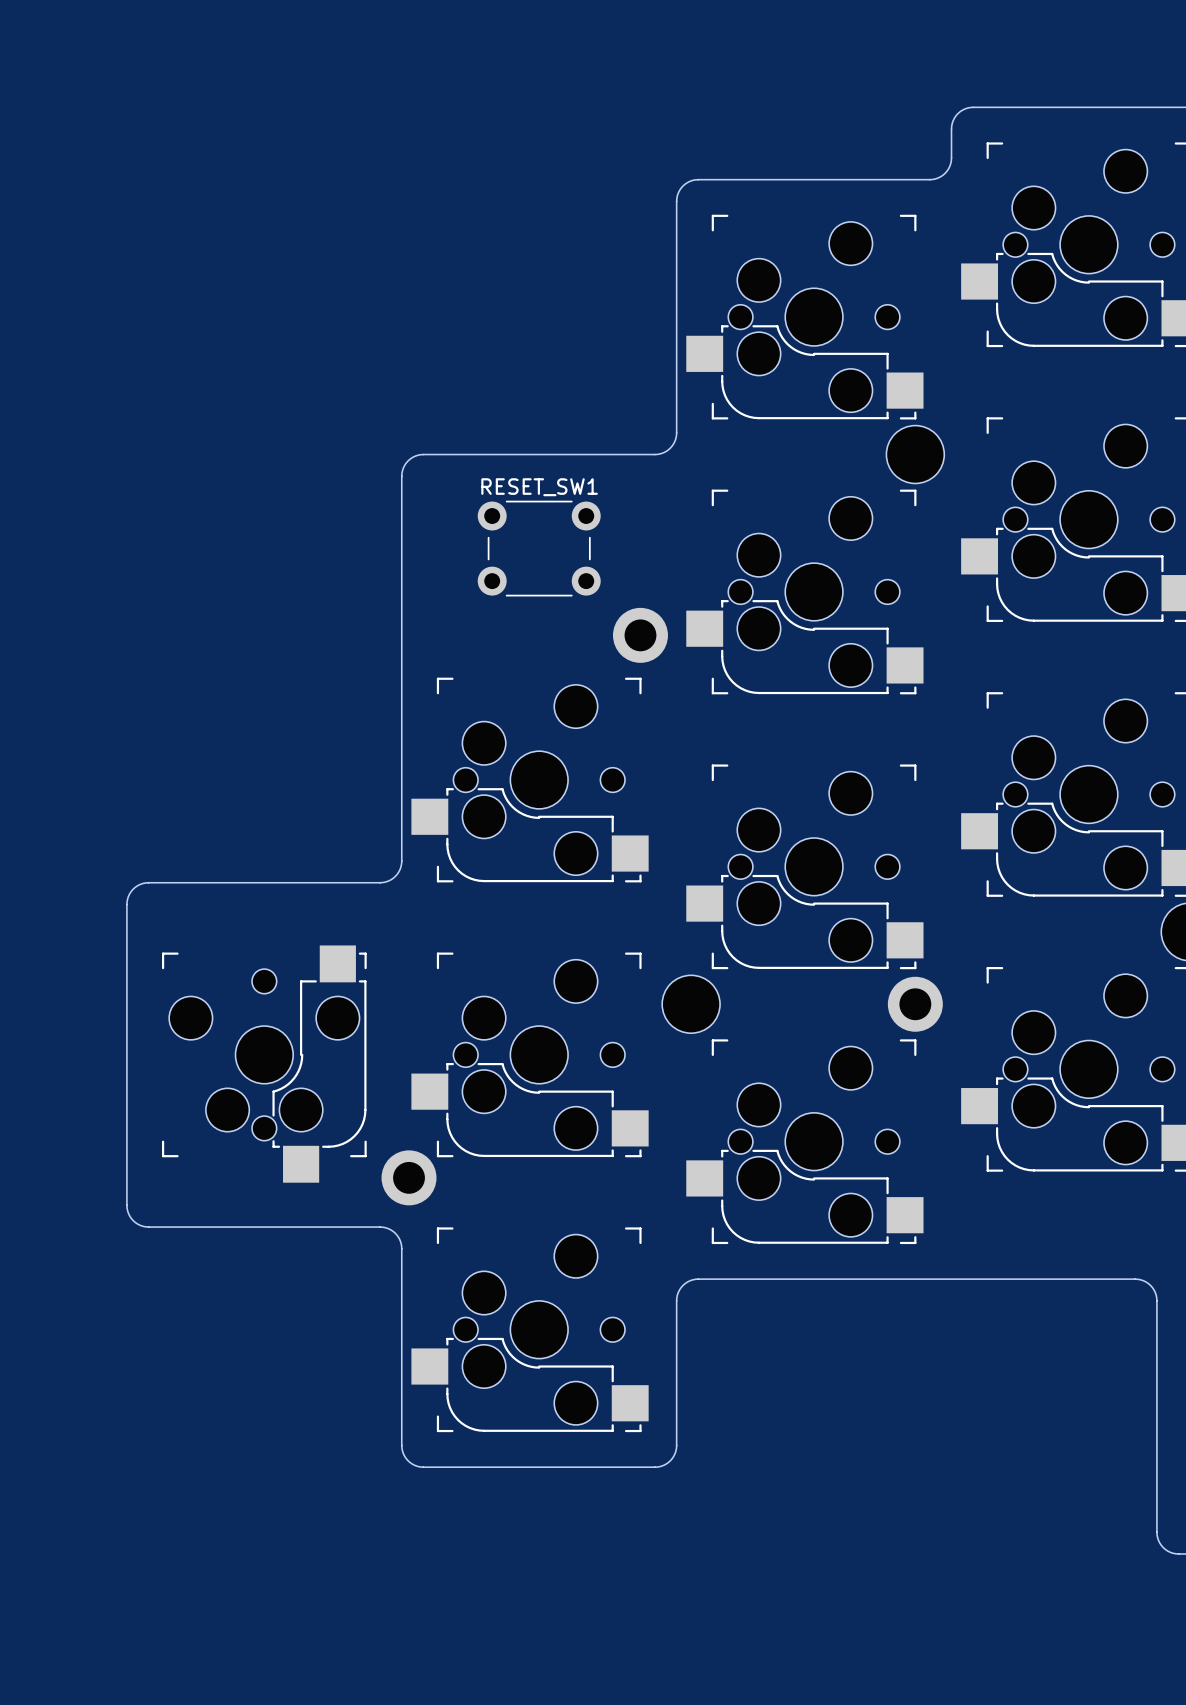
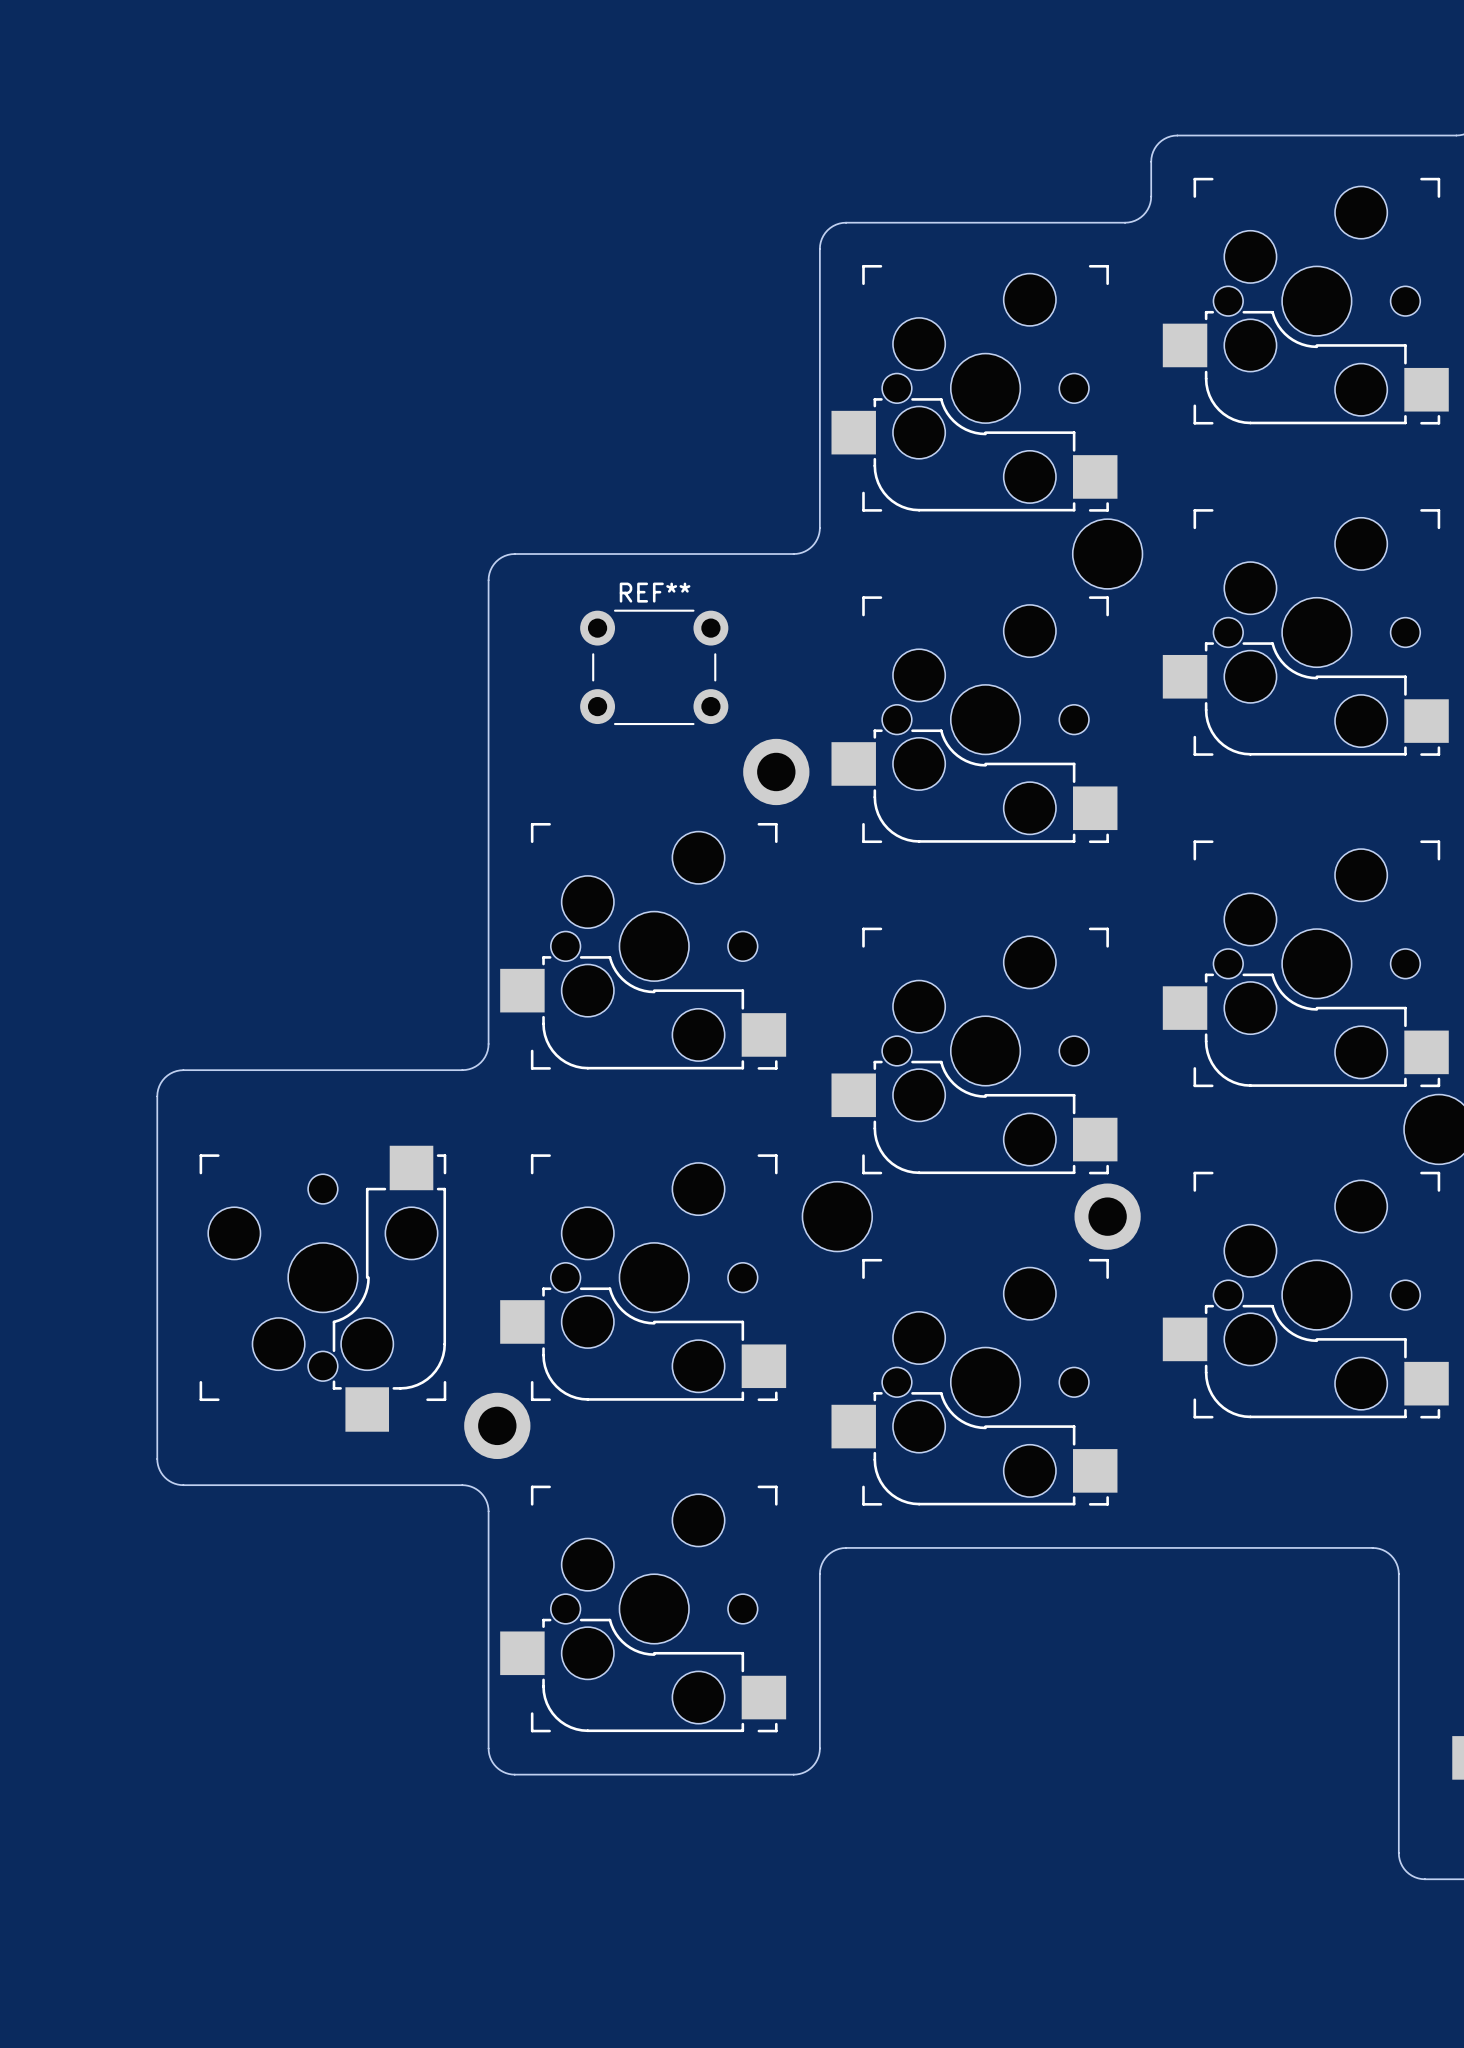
RESET_SW1 name: RESET_SW1 (539, 487) -> REF** (655, 592)

